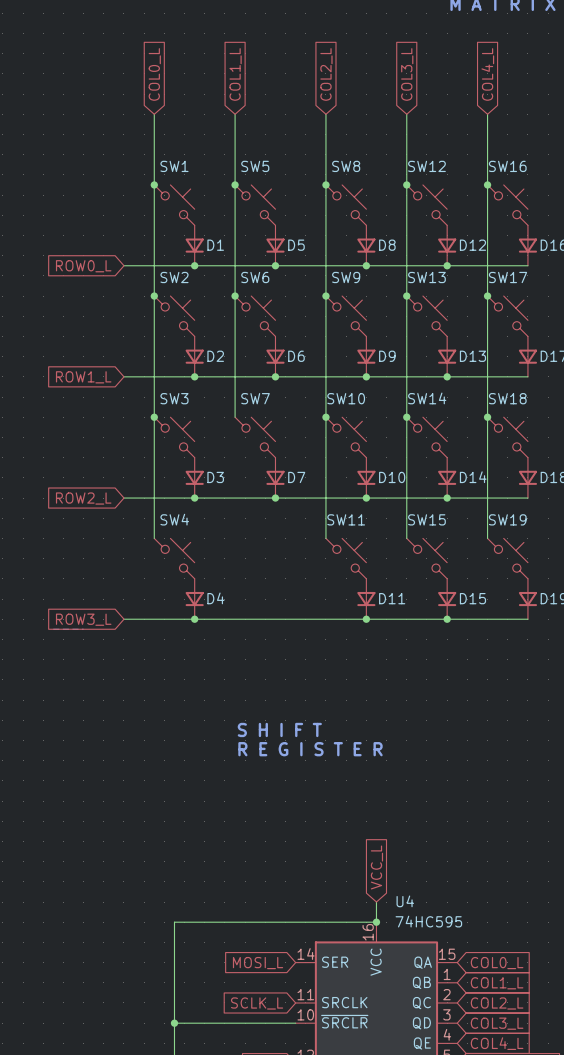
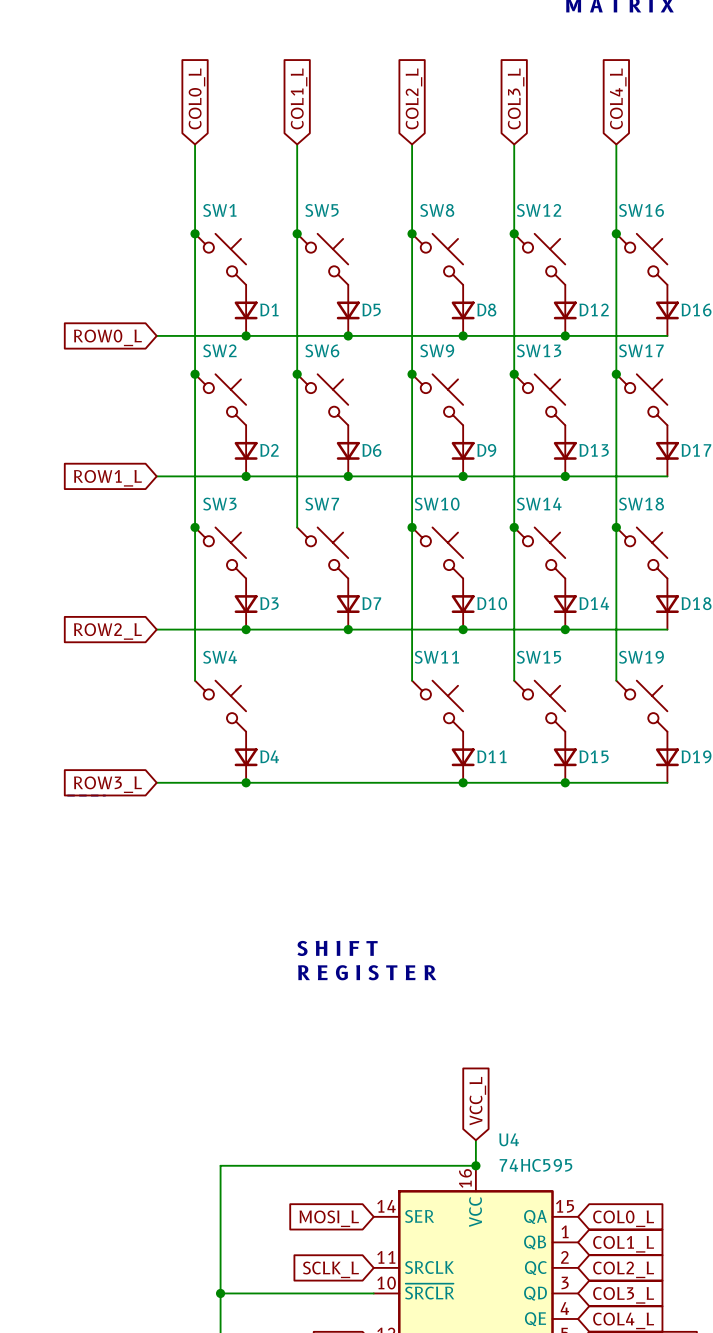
text: S H I F T (279, 729) -> none
text: R E G I S T E R (310, 749) -> S H I F T (337, 948)
text: none -> R E G I S T E R (367, 972)

